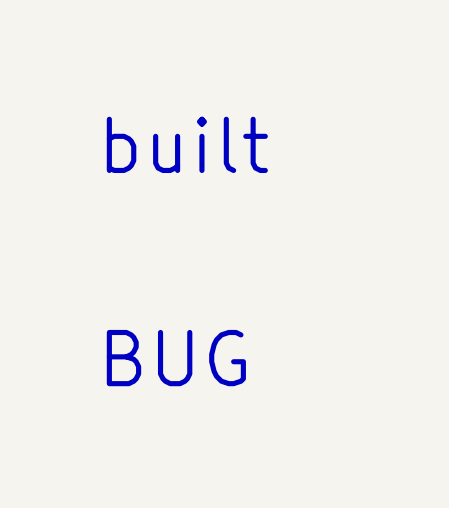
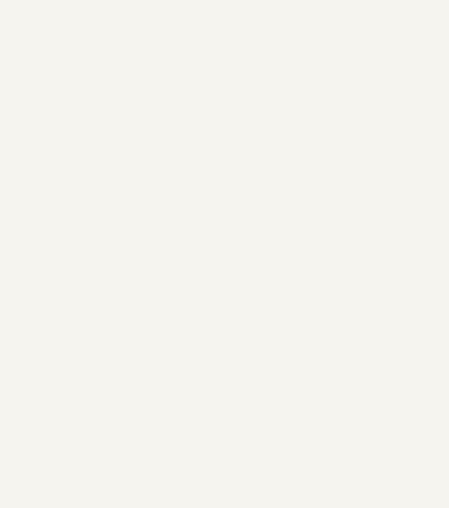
text: built (187, 144) -> none
text: BUG (176, 358) -> none

